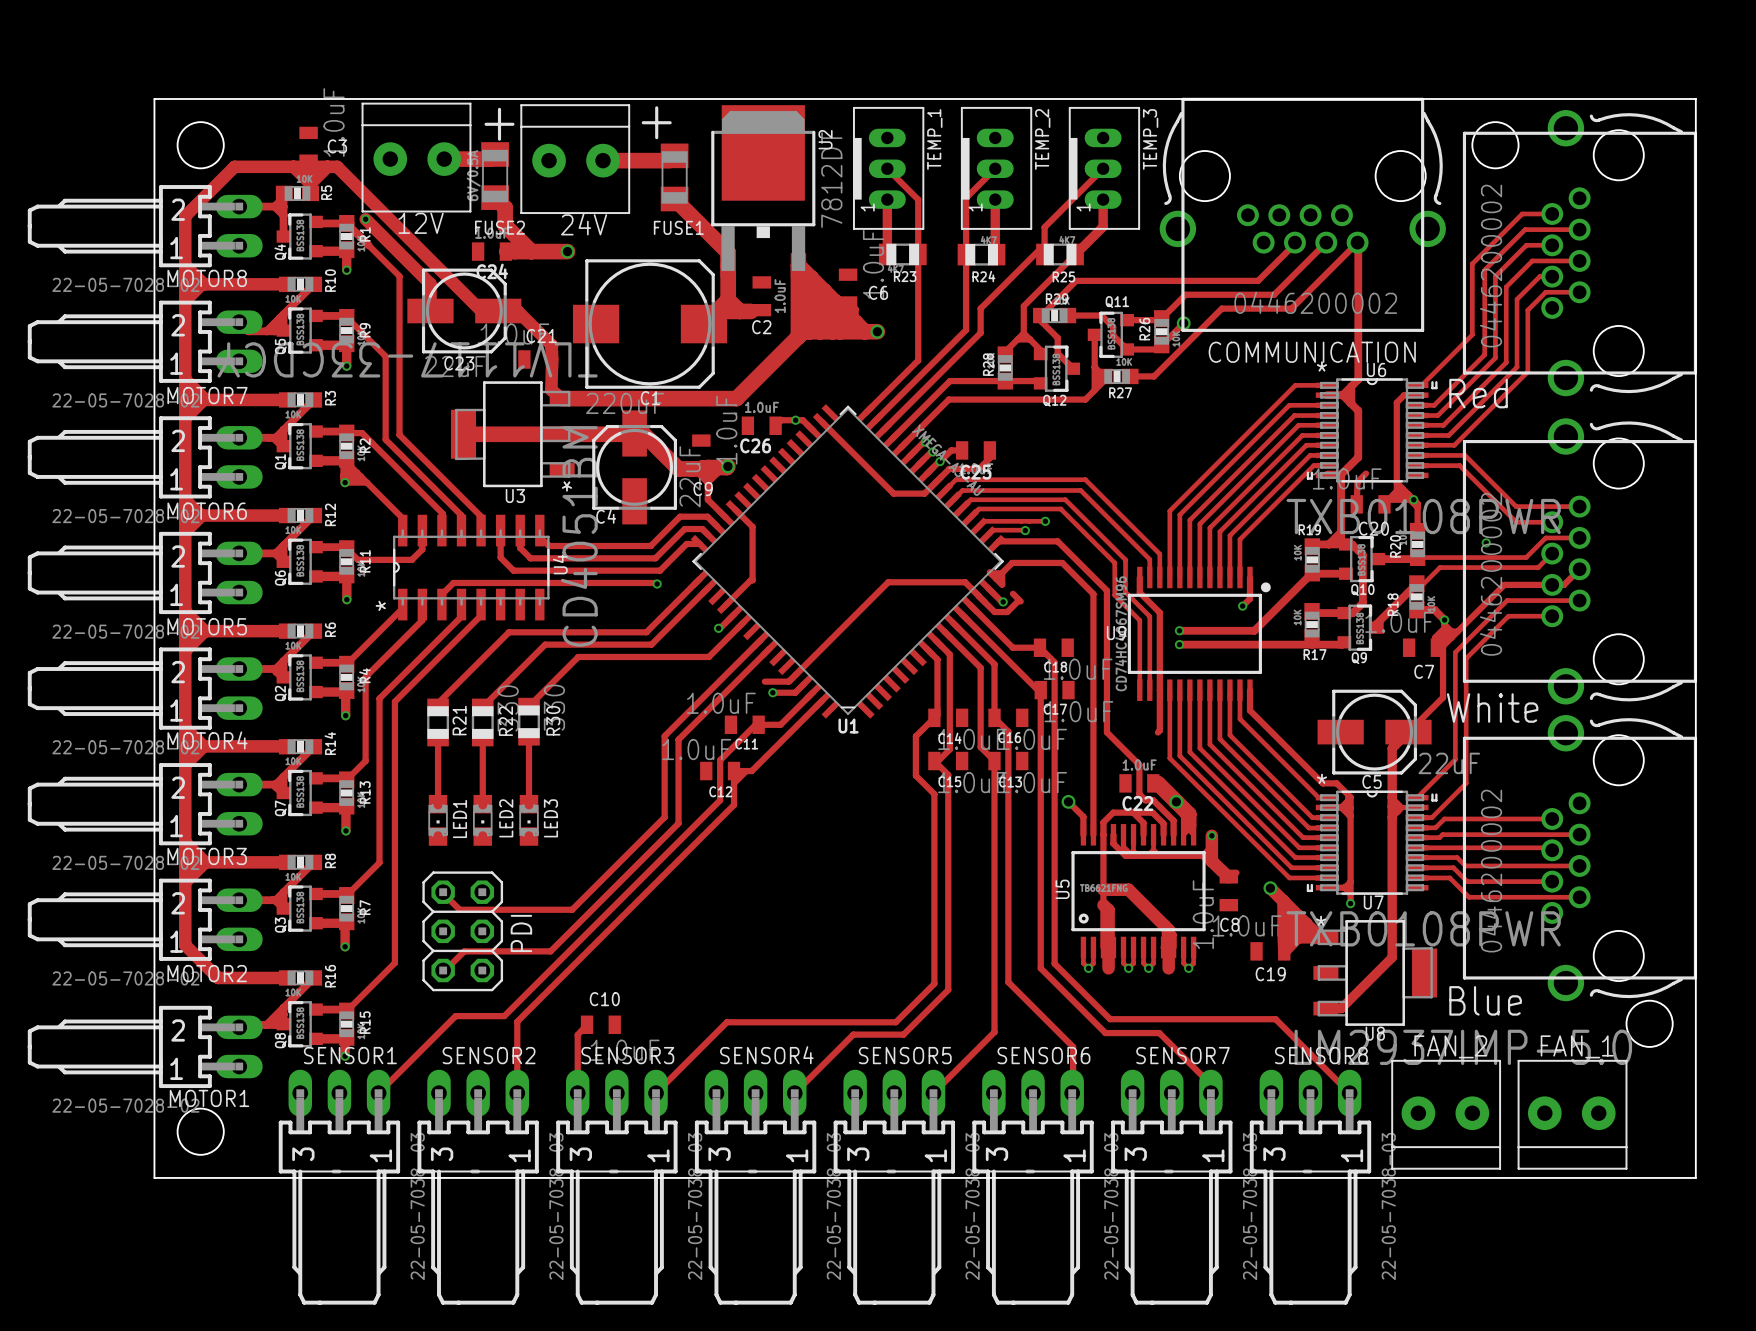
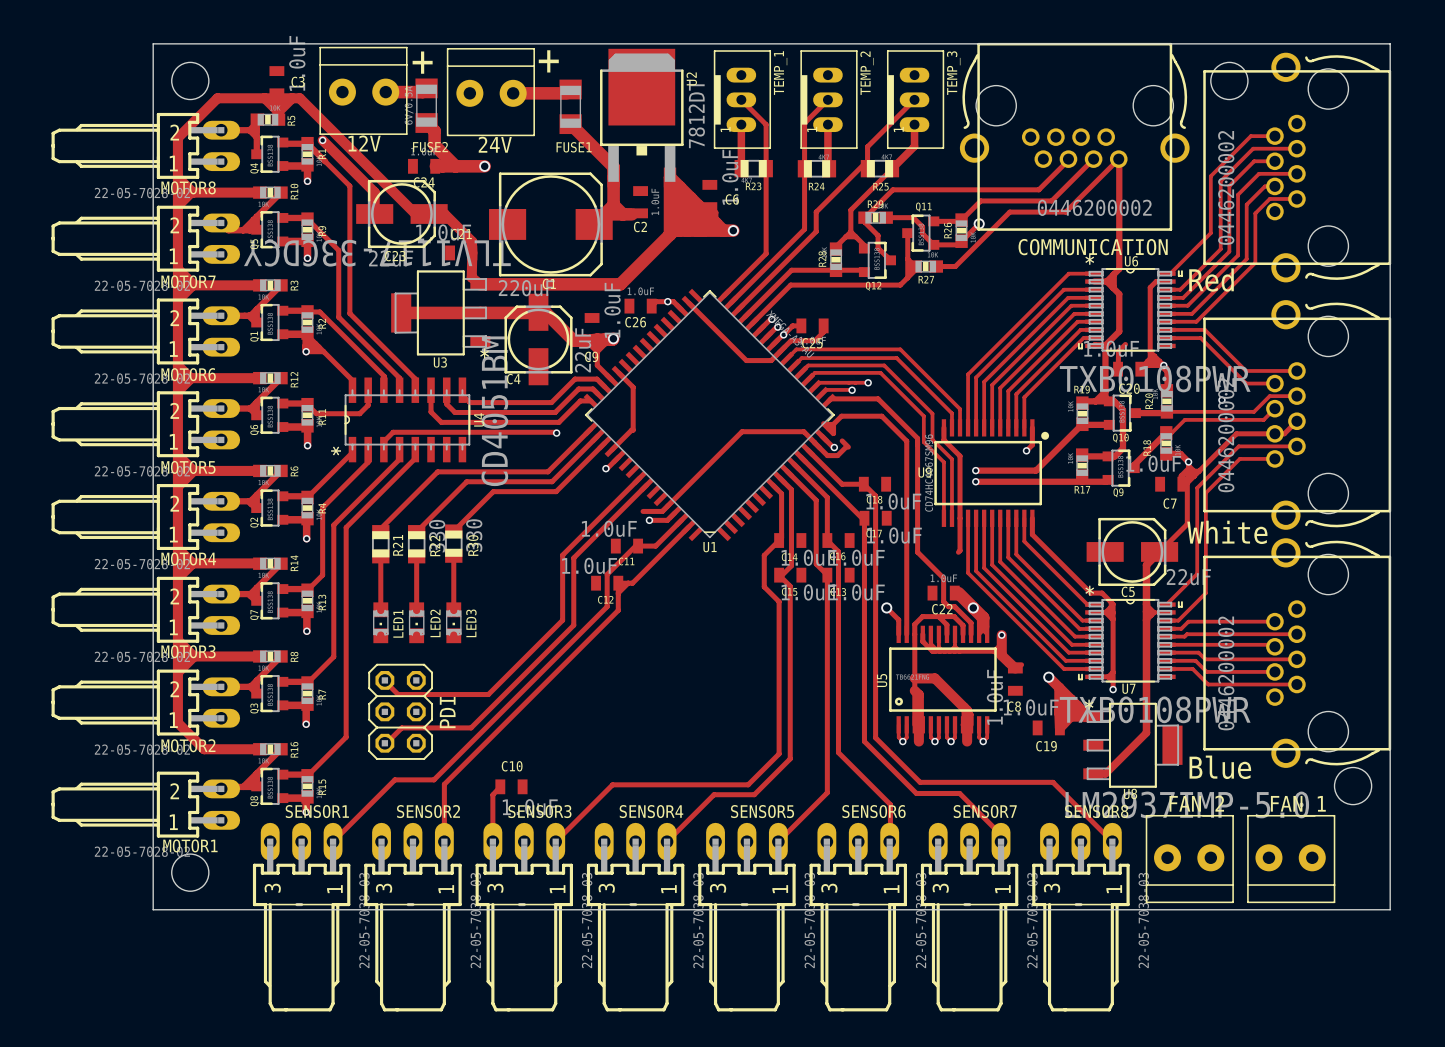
track: (743, 622) (708, 656) (656, 656) -> (604, 442) (556, 491)

